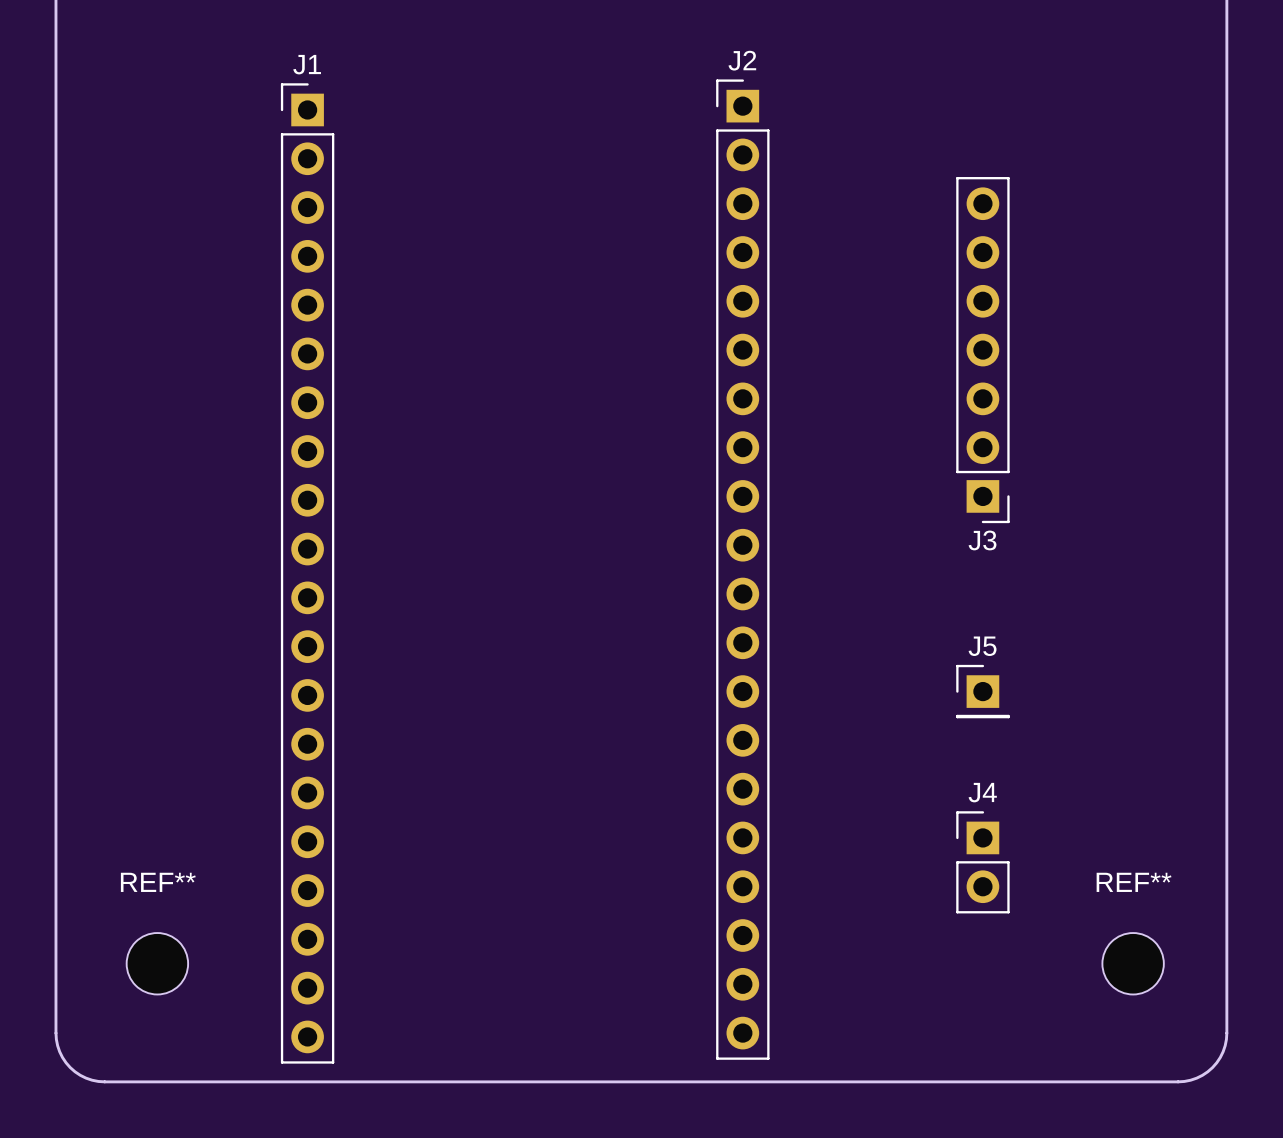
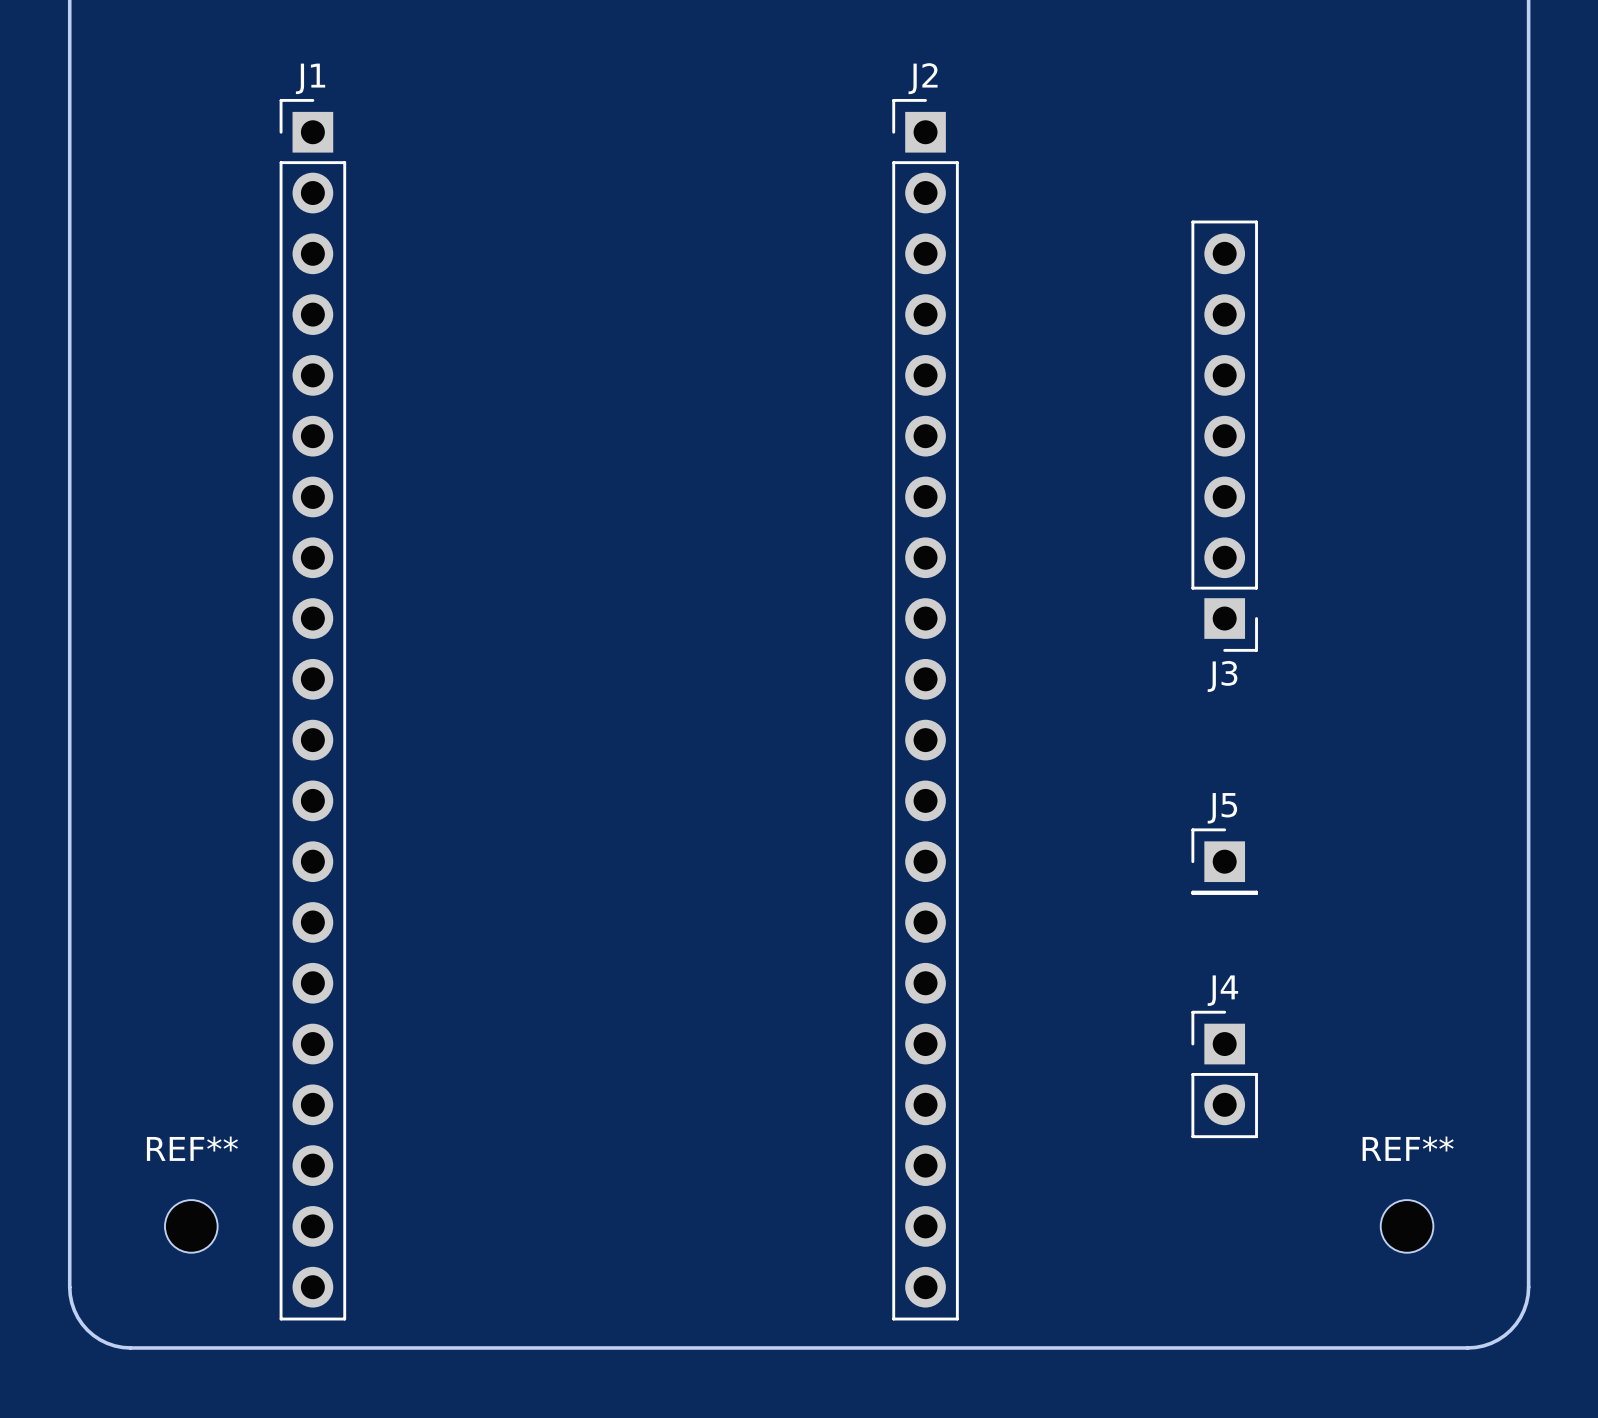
J1 position: (307, 573) -> (312, 709)
REF**: (157, 963) -> none
REF**: (1133, 963) -> none
REF**: none -> (191, 1226)
REF**: none -> (1407, 1226)

